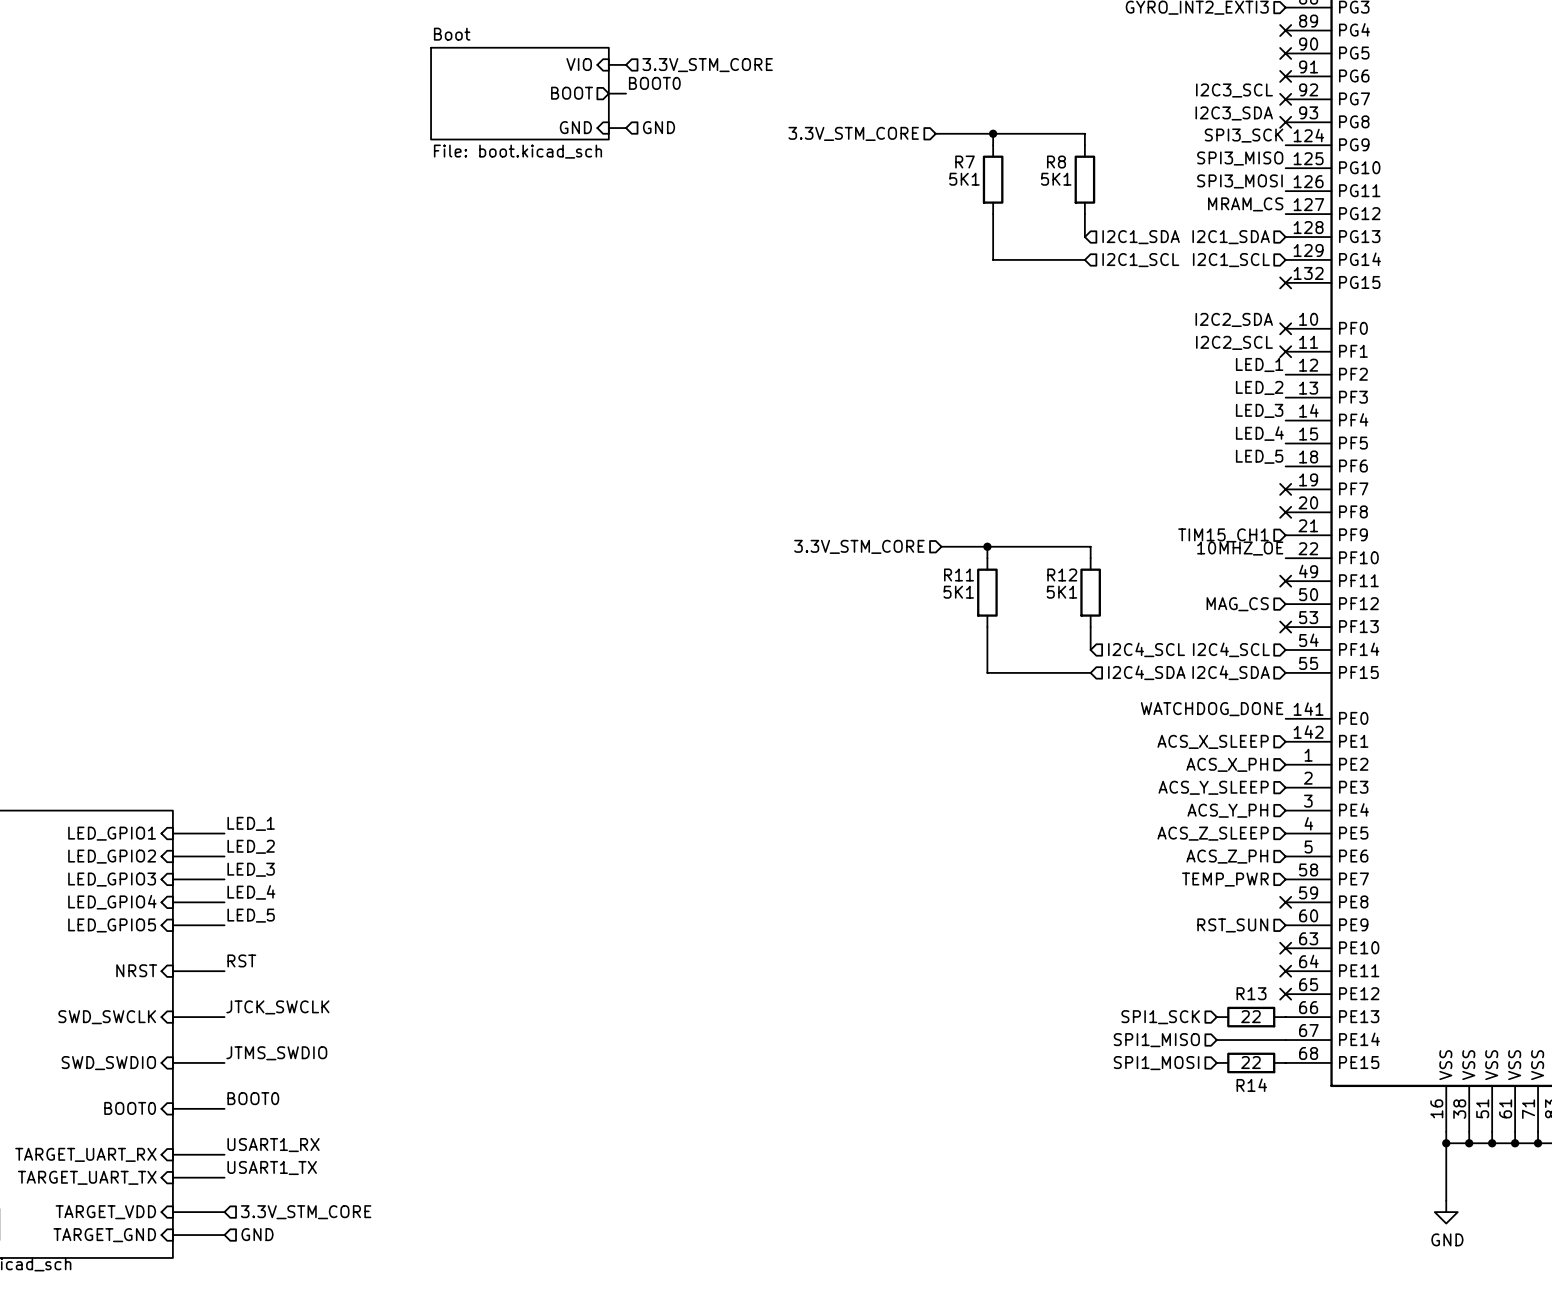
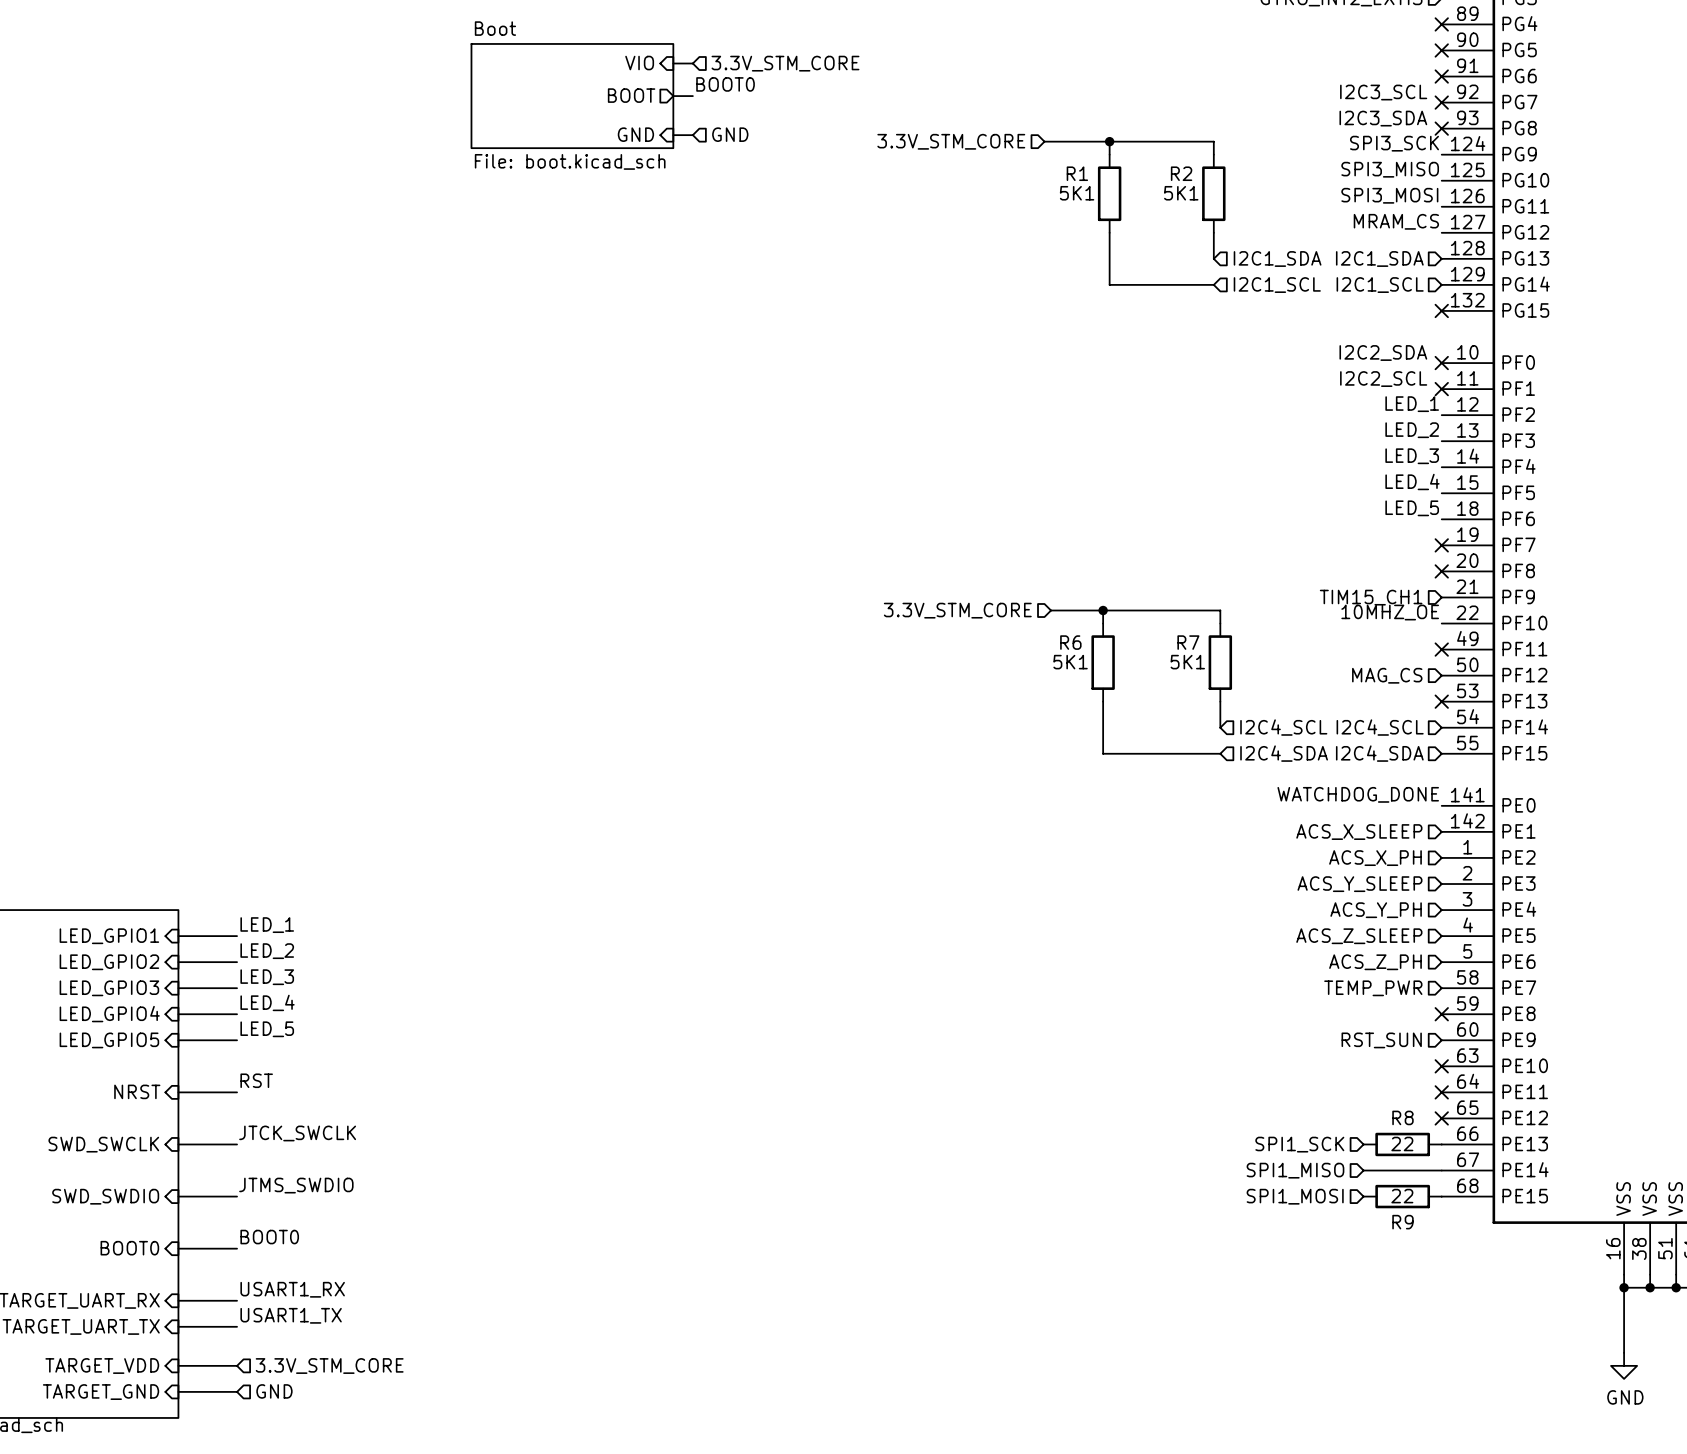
R7 name: R7 (965, 162) -> R1 (1077, 173)
R8 name: R8 (1056, 162) -> R2 (1181, 173)
R11 name: R11 (958, 575) -> R6 (1070, 642)
R12 name: R12 (1062, 575) -> R7 (1188, 642)
R13 name: R13 (1251, 993) -> R8 (1402, 1117)
R14 name: R14 (1251, 1085) -> R9 (1402, 1222)

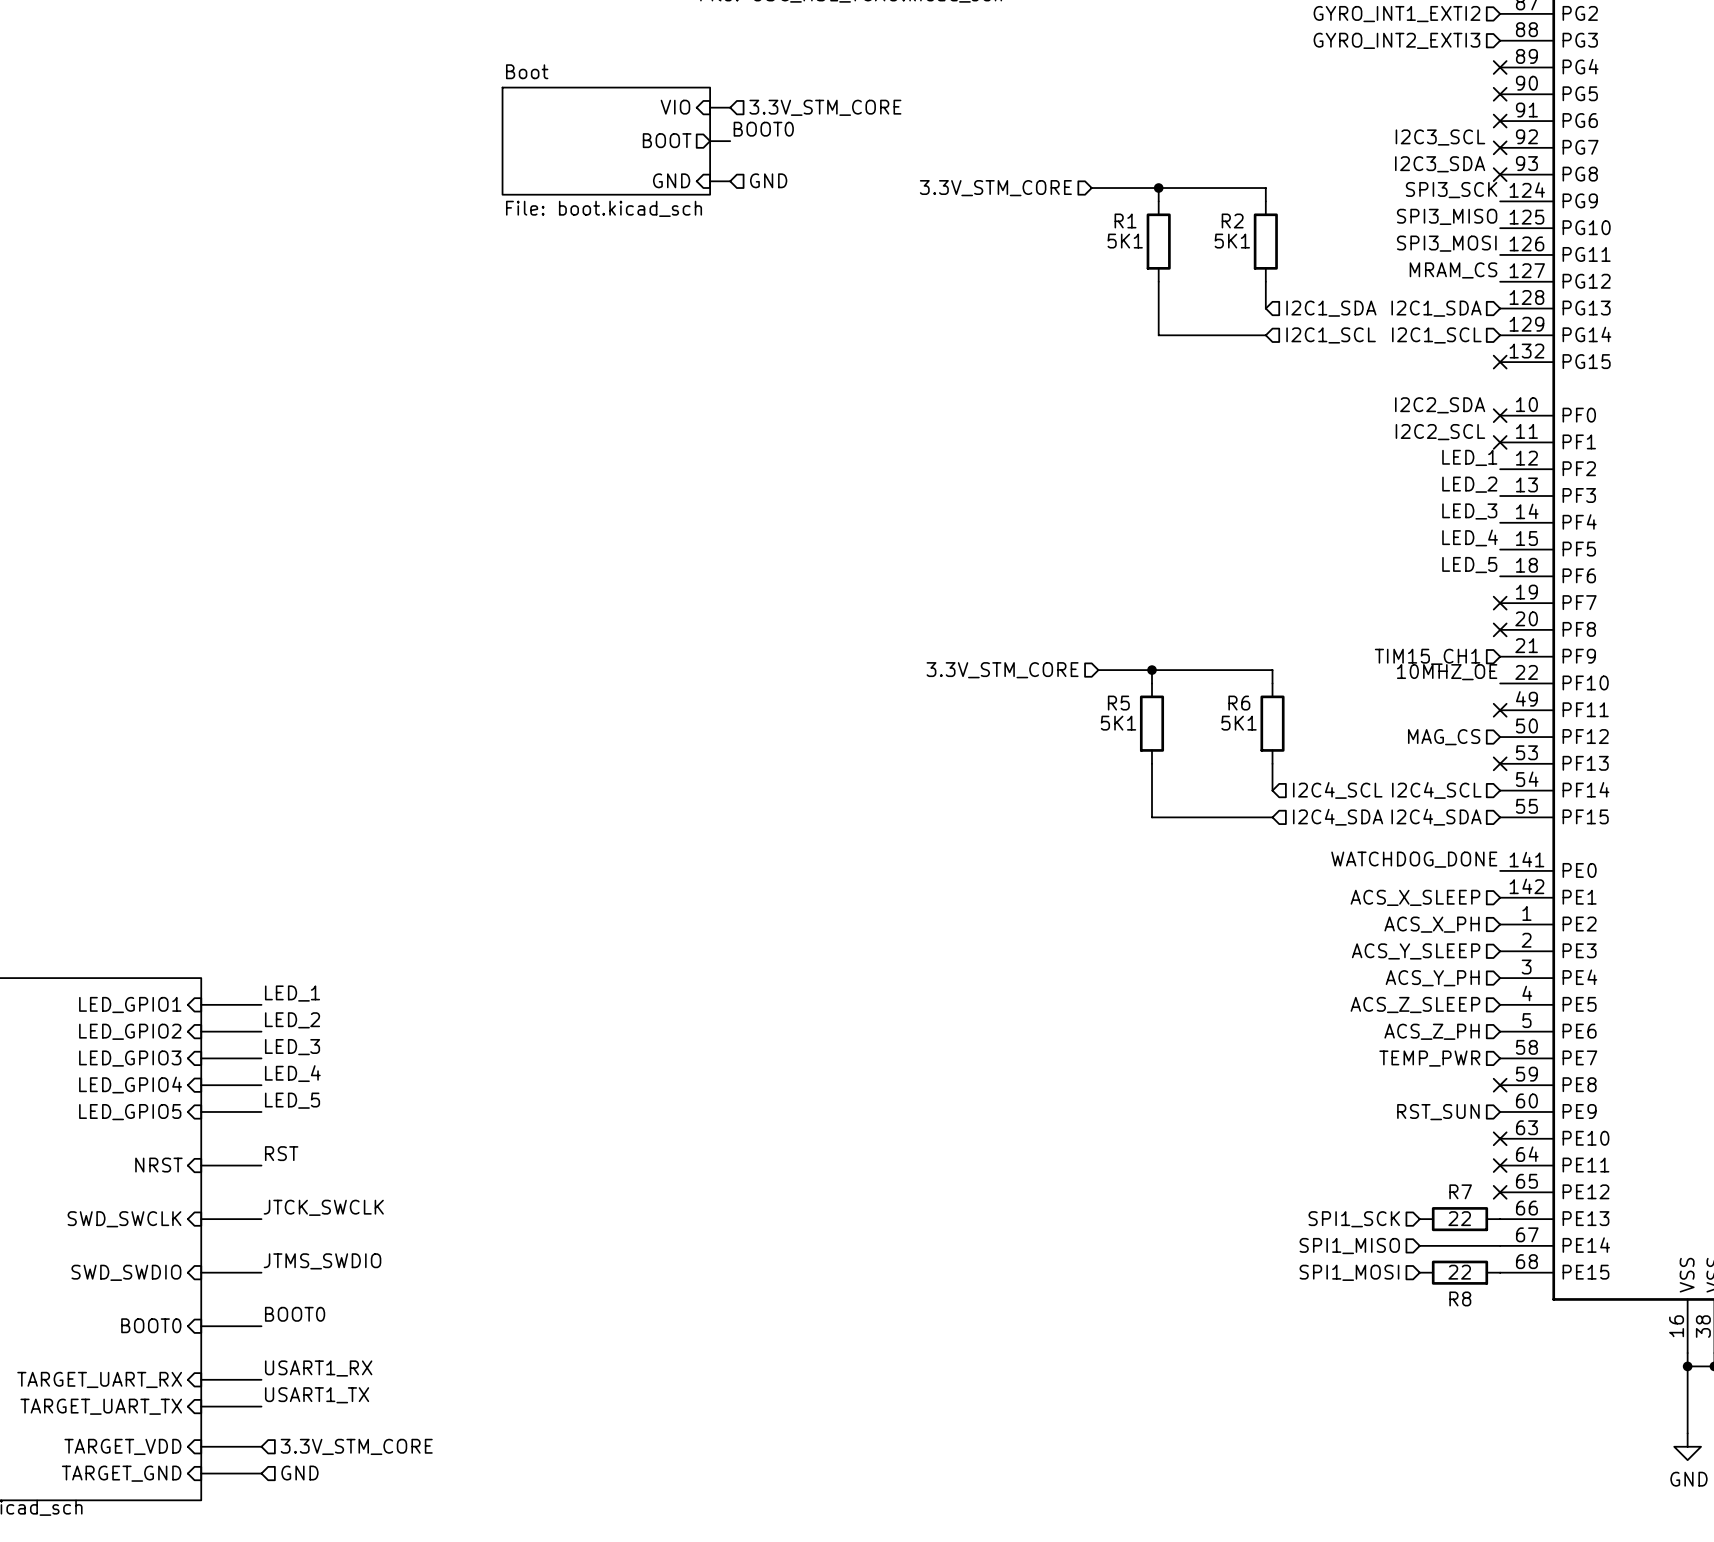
R6 name: R6 (1070, 642) -> R5 (1118, 703)
R7 name: R7 (1188, 642) -> R6 (1239, 703)
R8 name: R8 (1402, 1117) -> R7 (1460, 1191)
R9 name: R9 (1402, 1222) -> R8 (1460, 1298)

